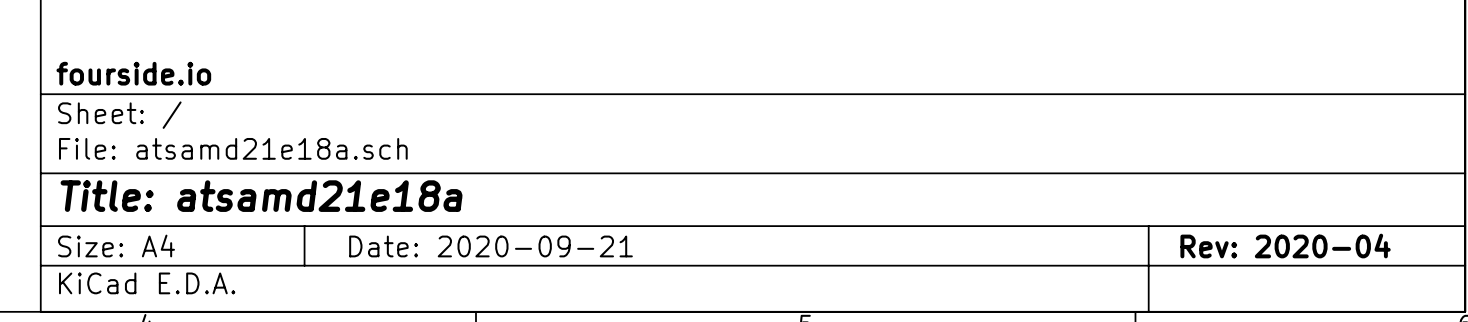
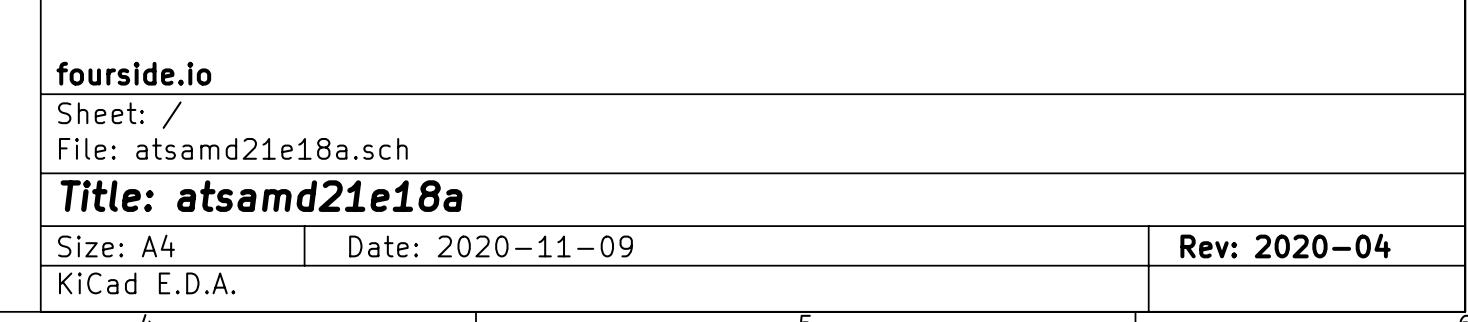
title block: Date: 2020-09-21 (491, 246) -> Date: 2020-11-09 (491, 246)

